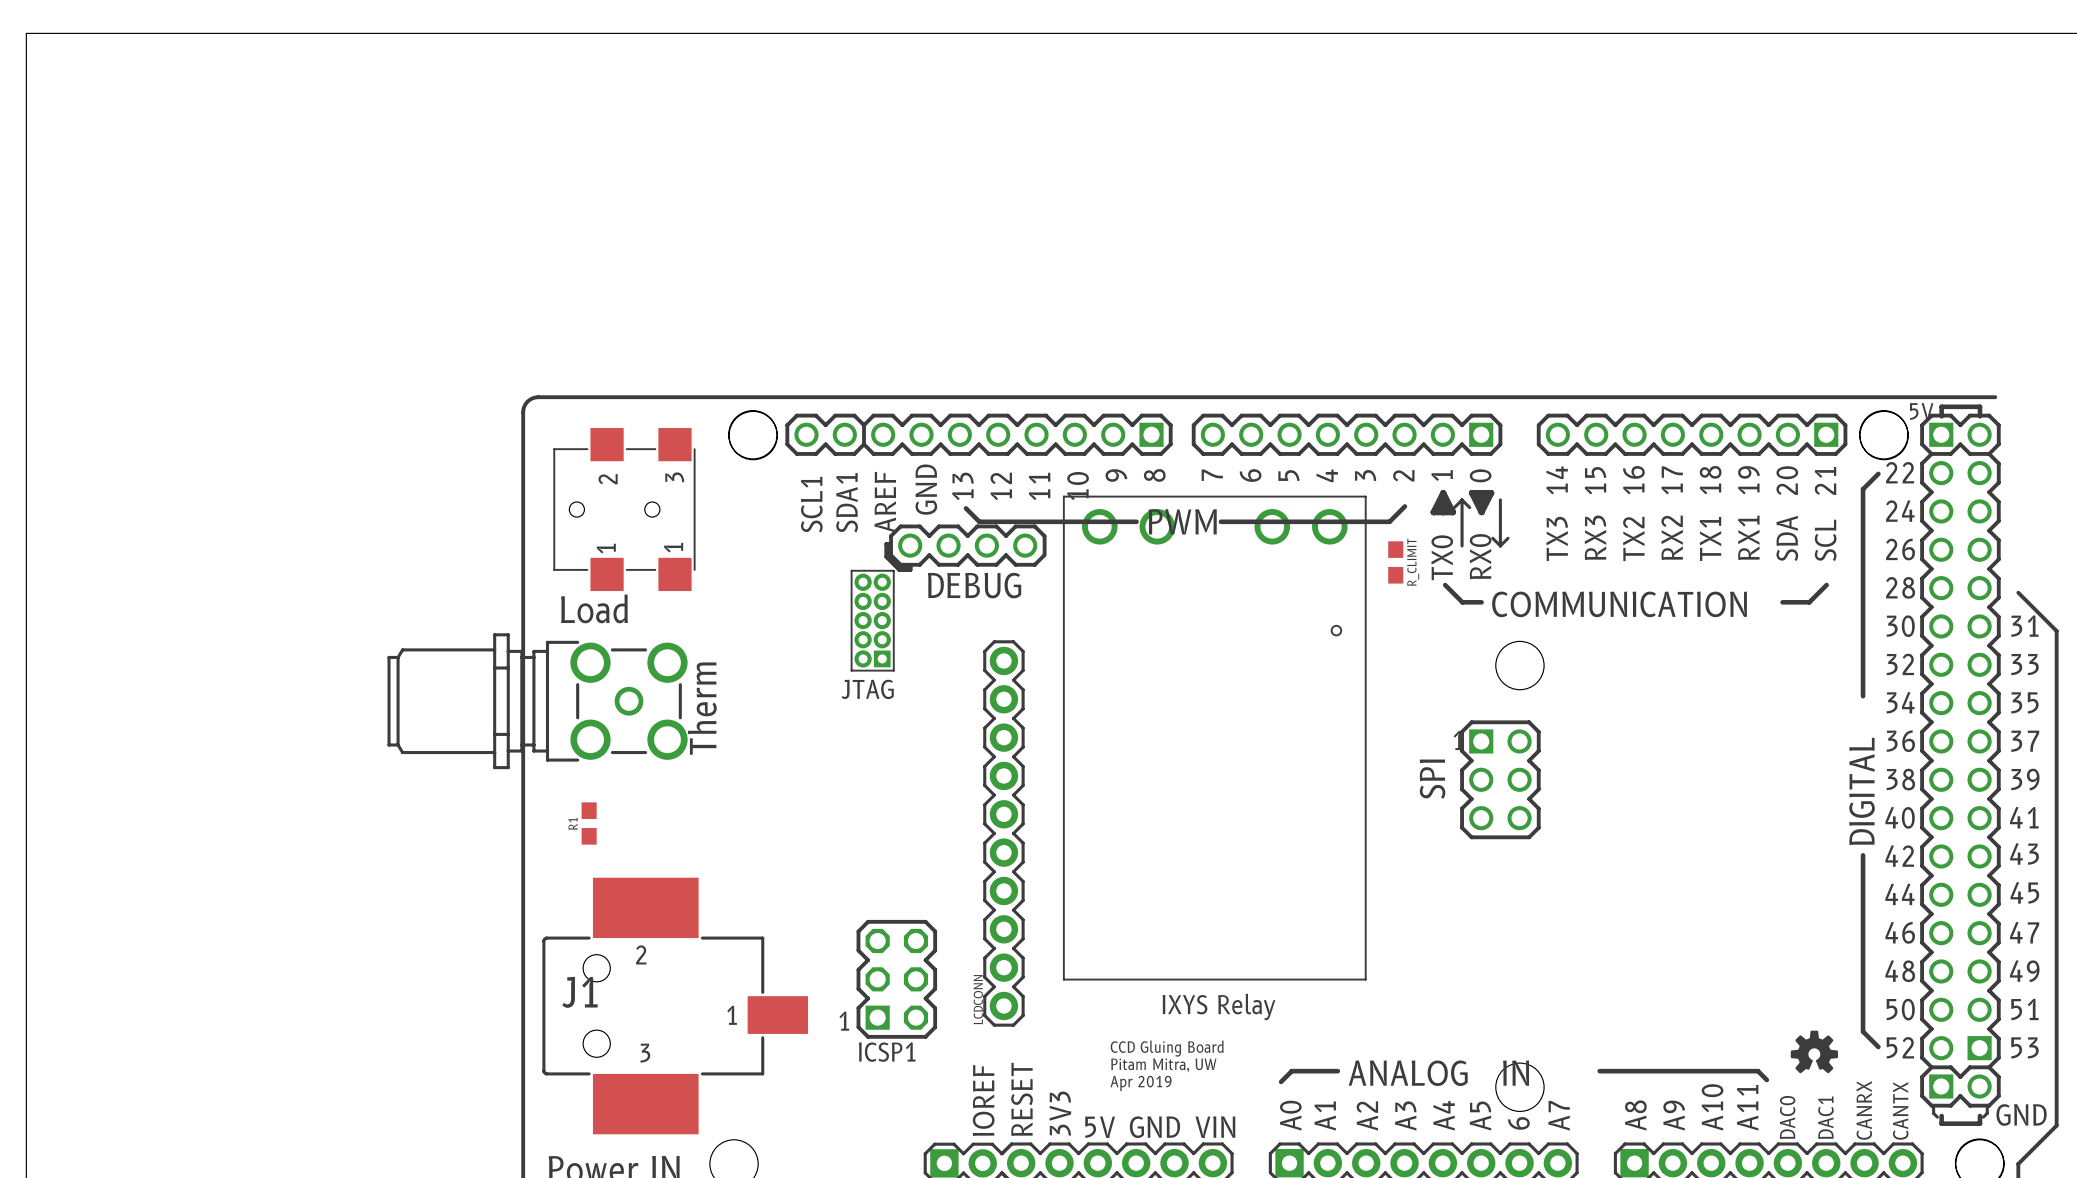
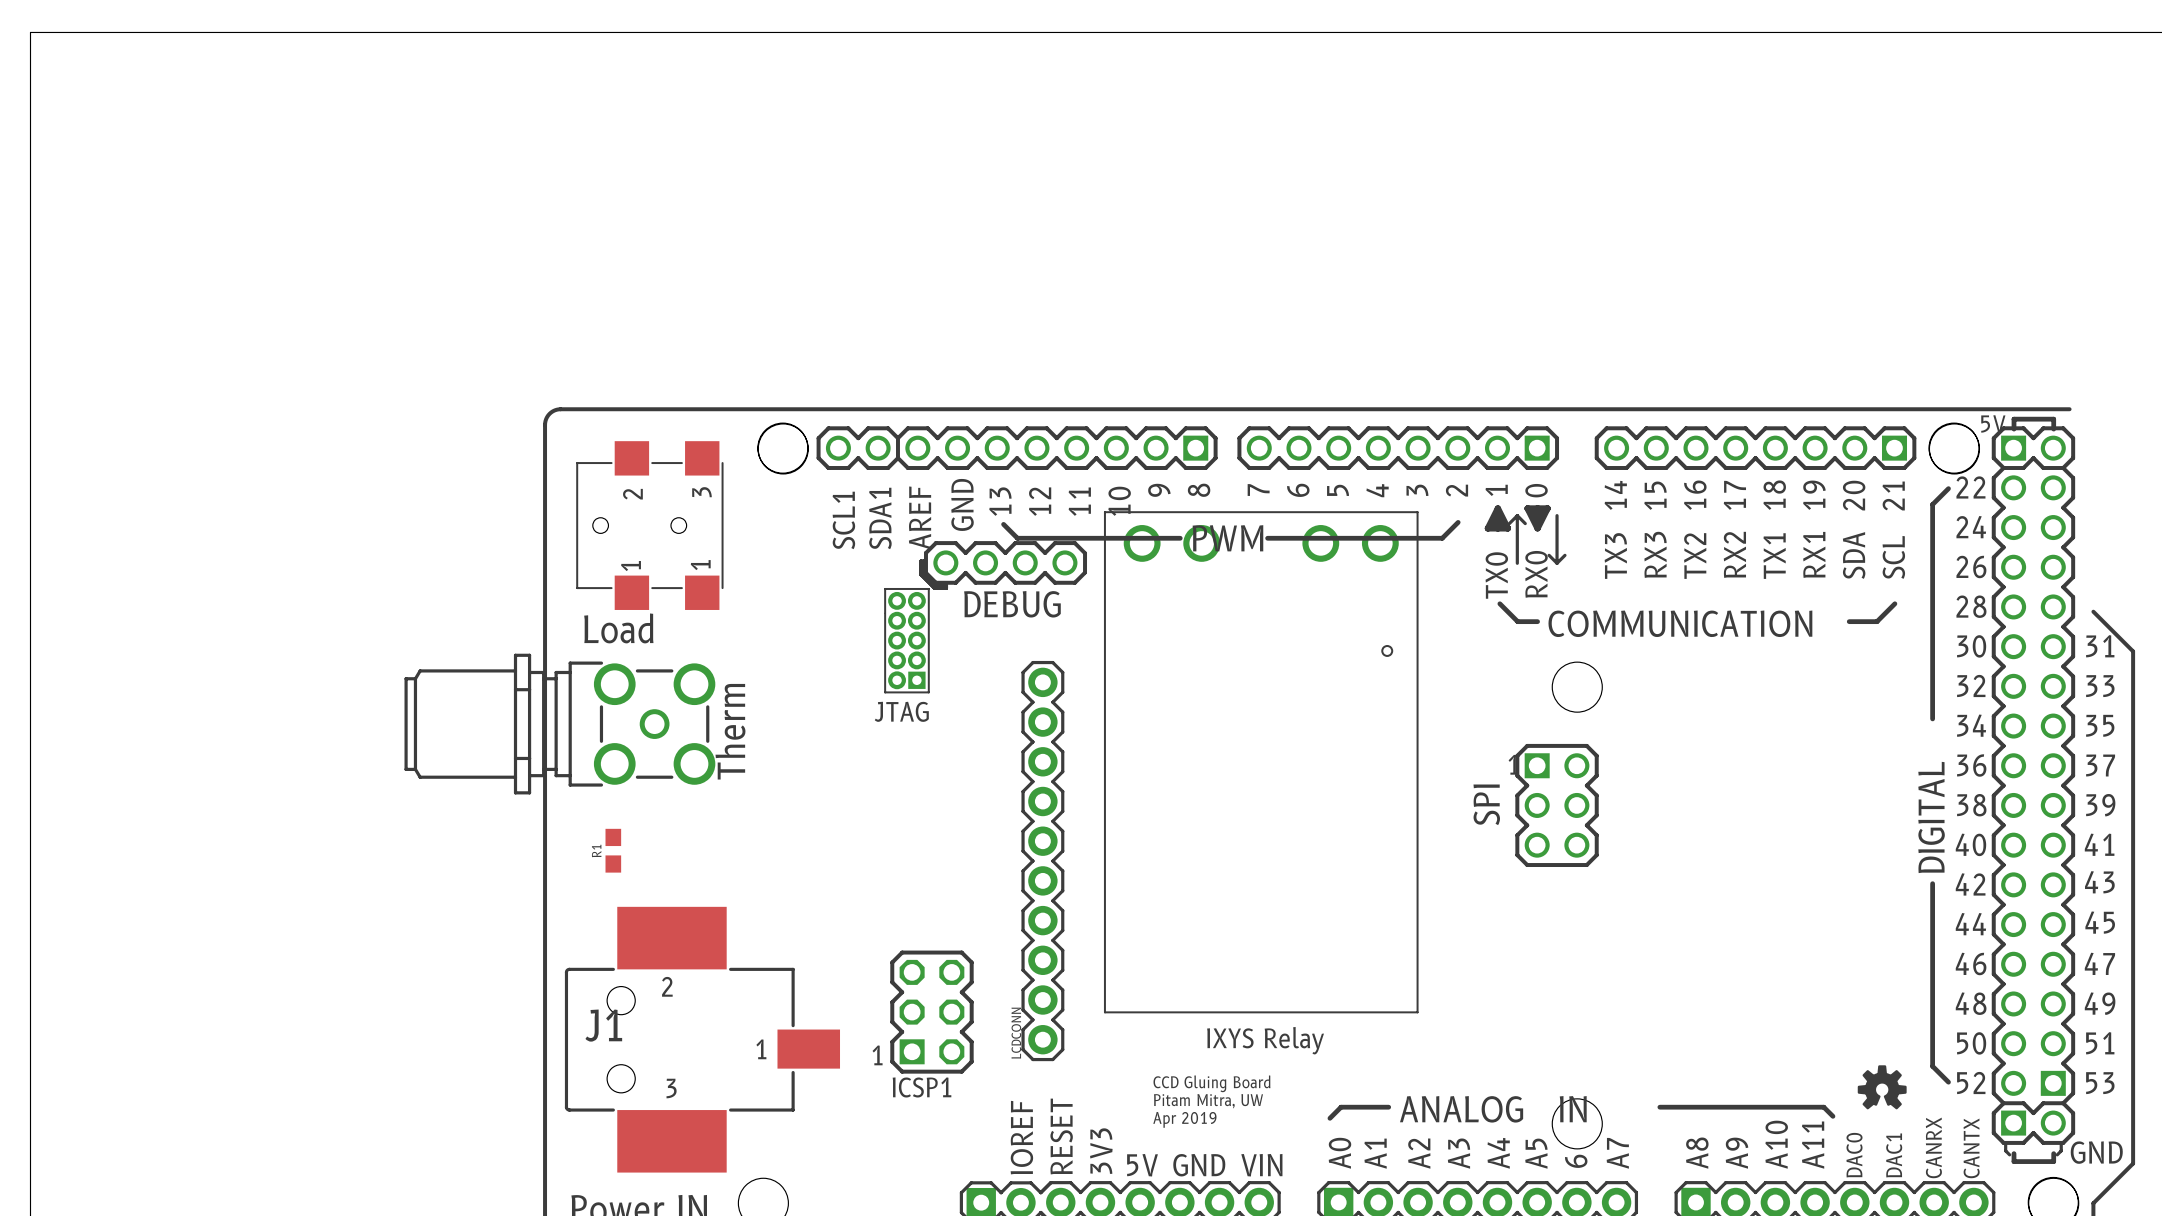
R_CLIMIT: (1395, 562) -> none

